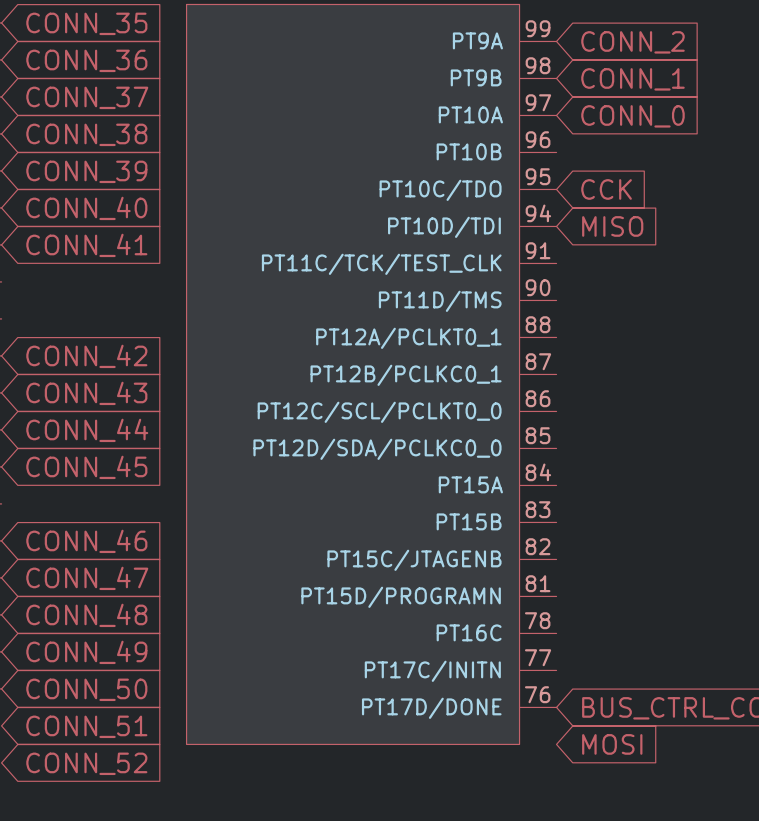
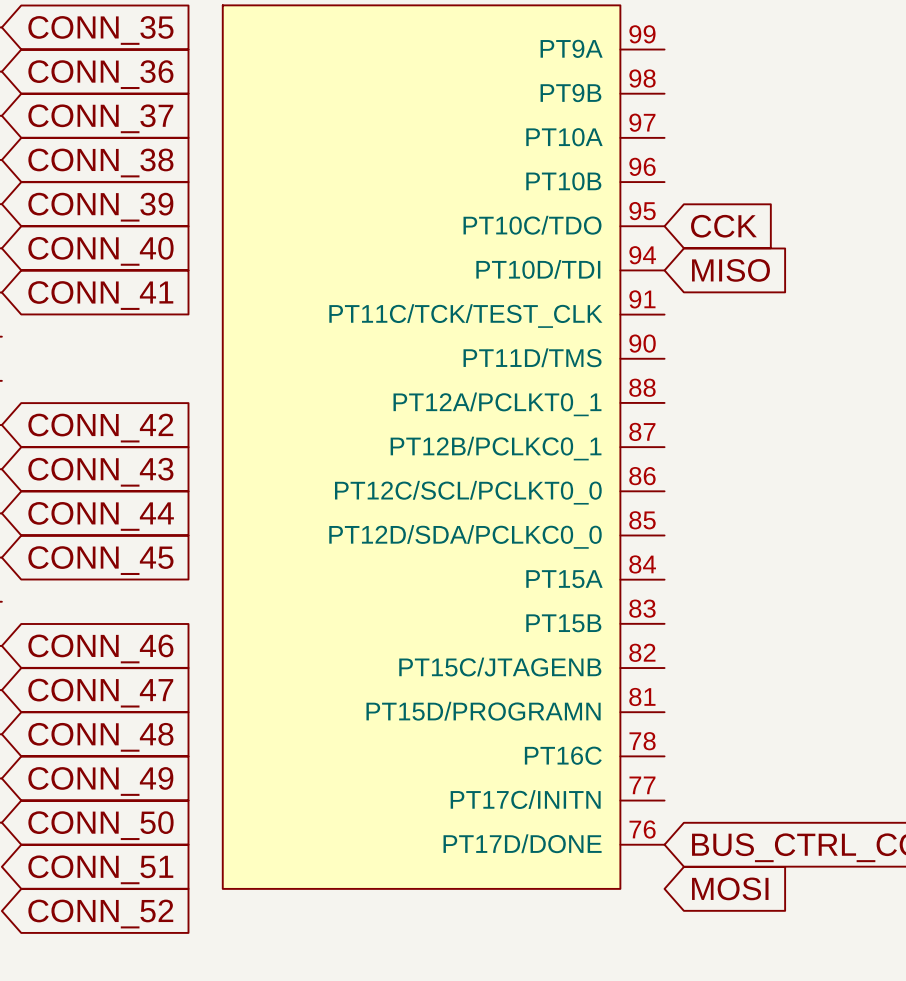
global label: CONN_2 (632, 42) -> none
global label: CONN_1 (632, 79) -> none
global label: CONN_0 (632, 116) -> none

